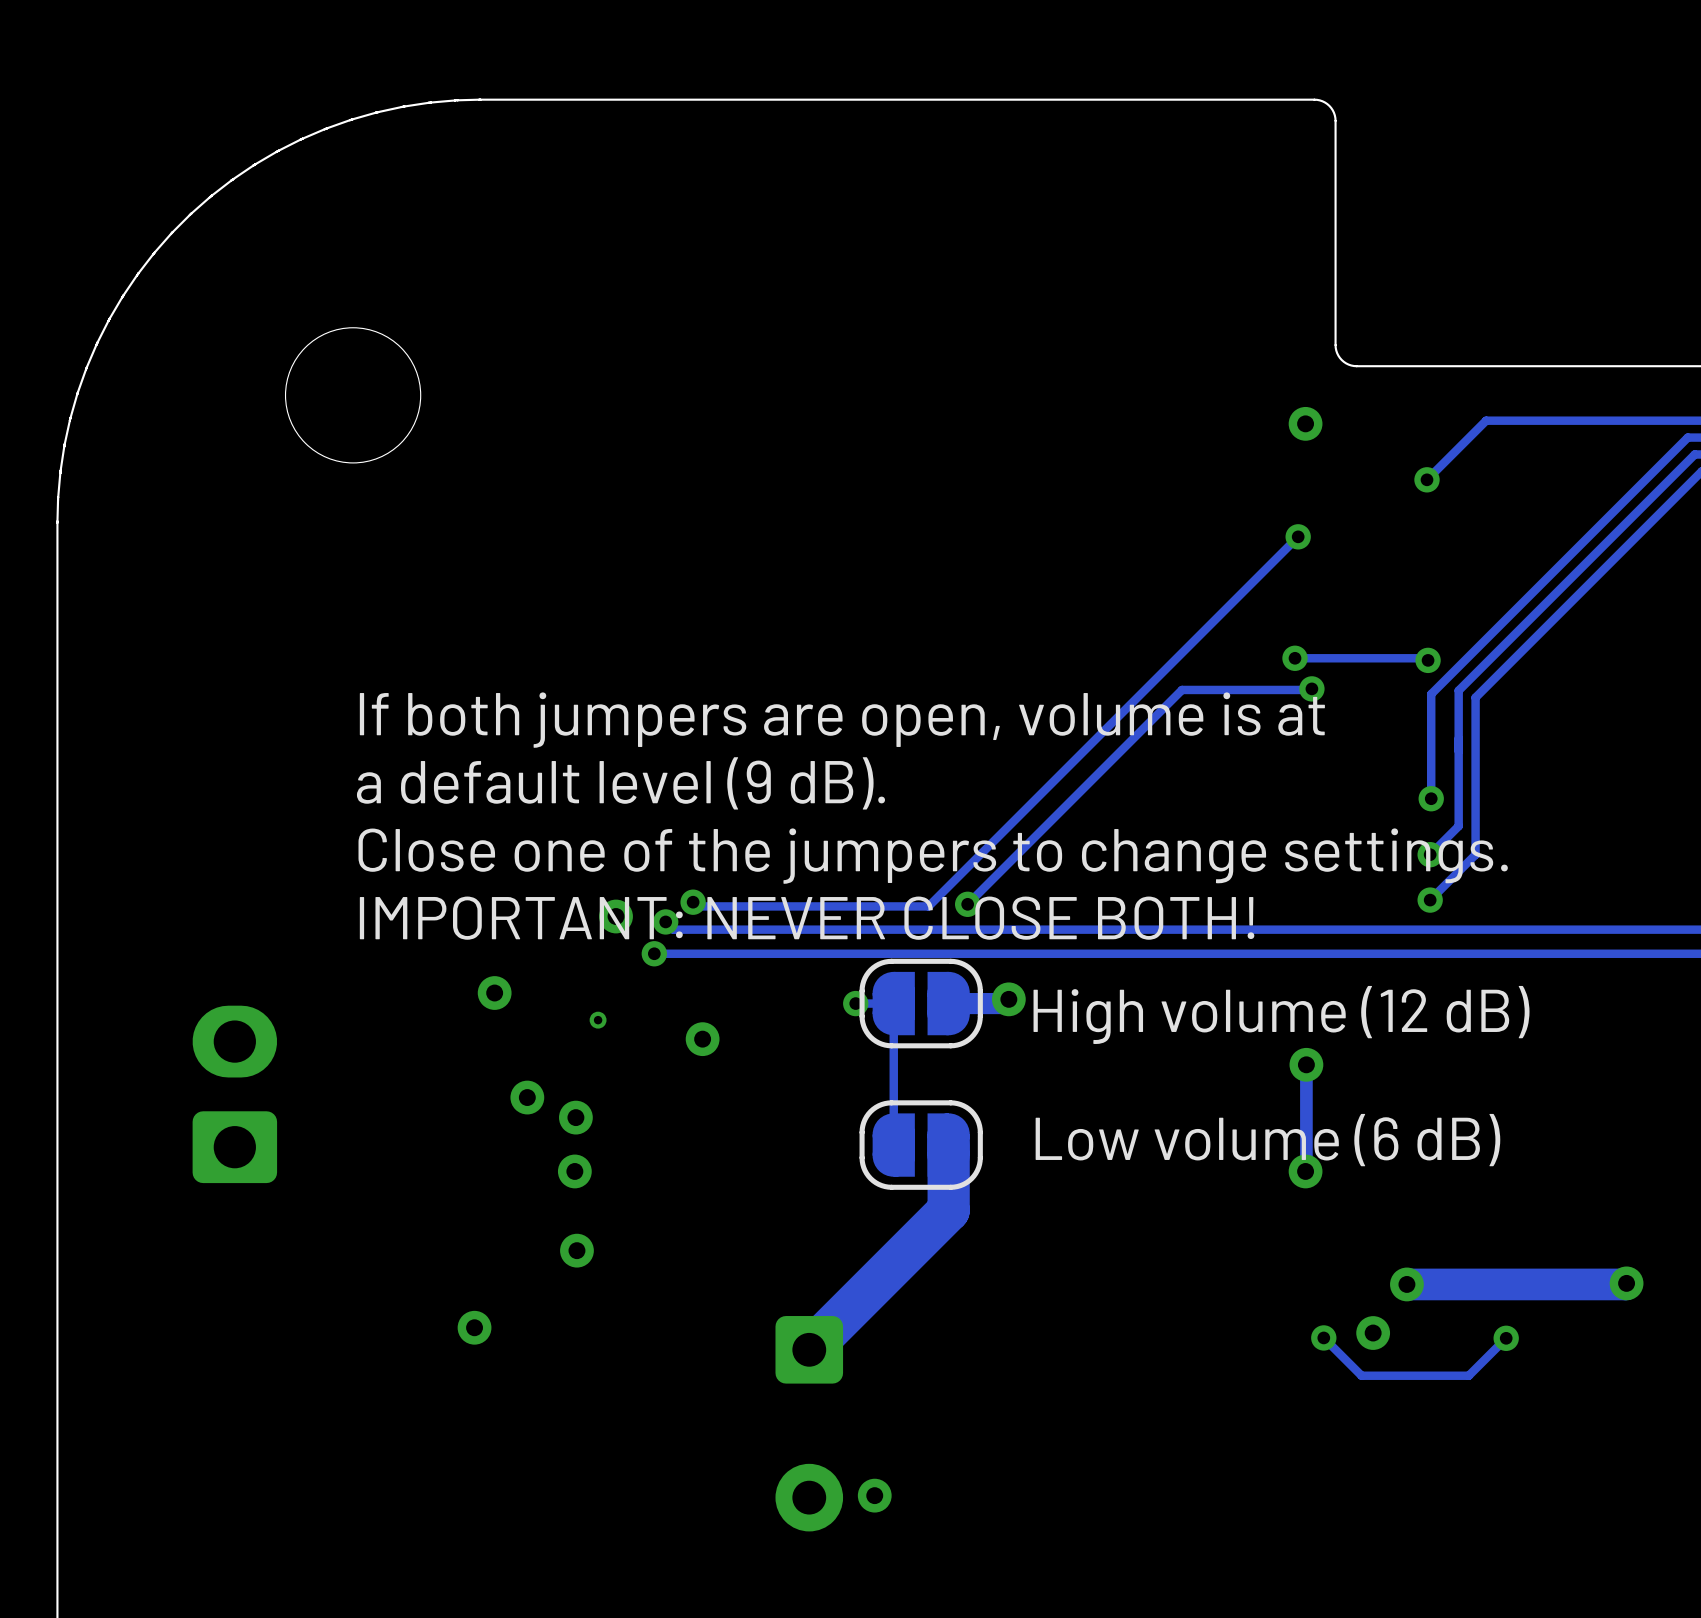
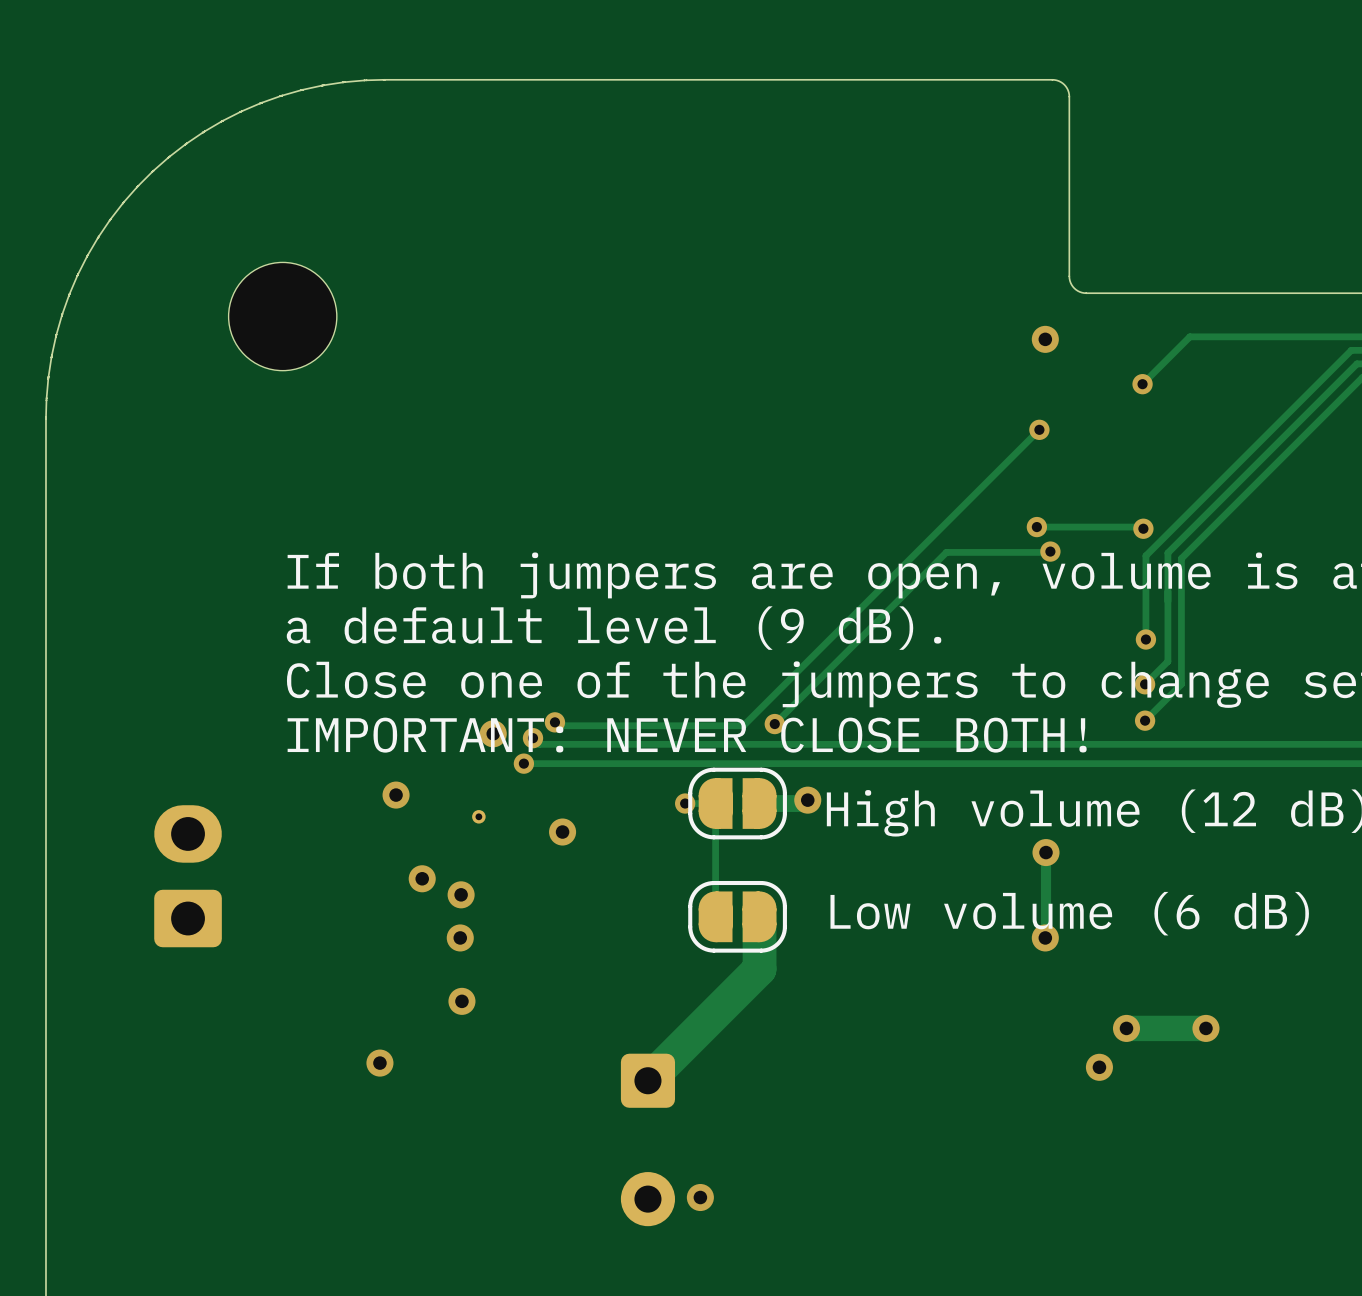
track: (1626, 1283) (1506, 1284) -> none
via position: (1626, 1283) -> (1205, 1028)
track: (1323, 1337) (1361, 1375) (1468, 1375) (1506, 1338) -> none
via: (1323, 1337) -> none
via: (1506, 1338) -> none

